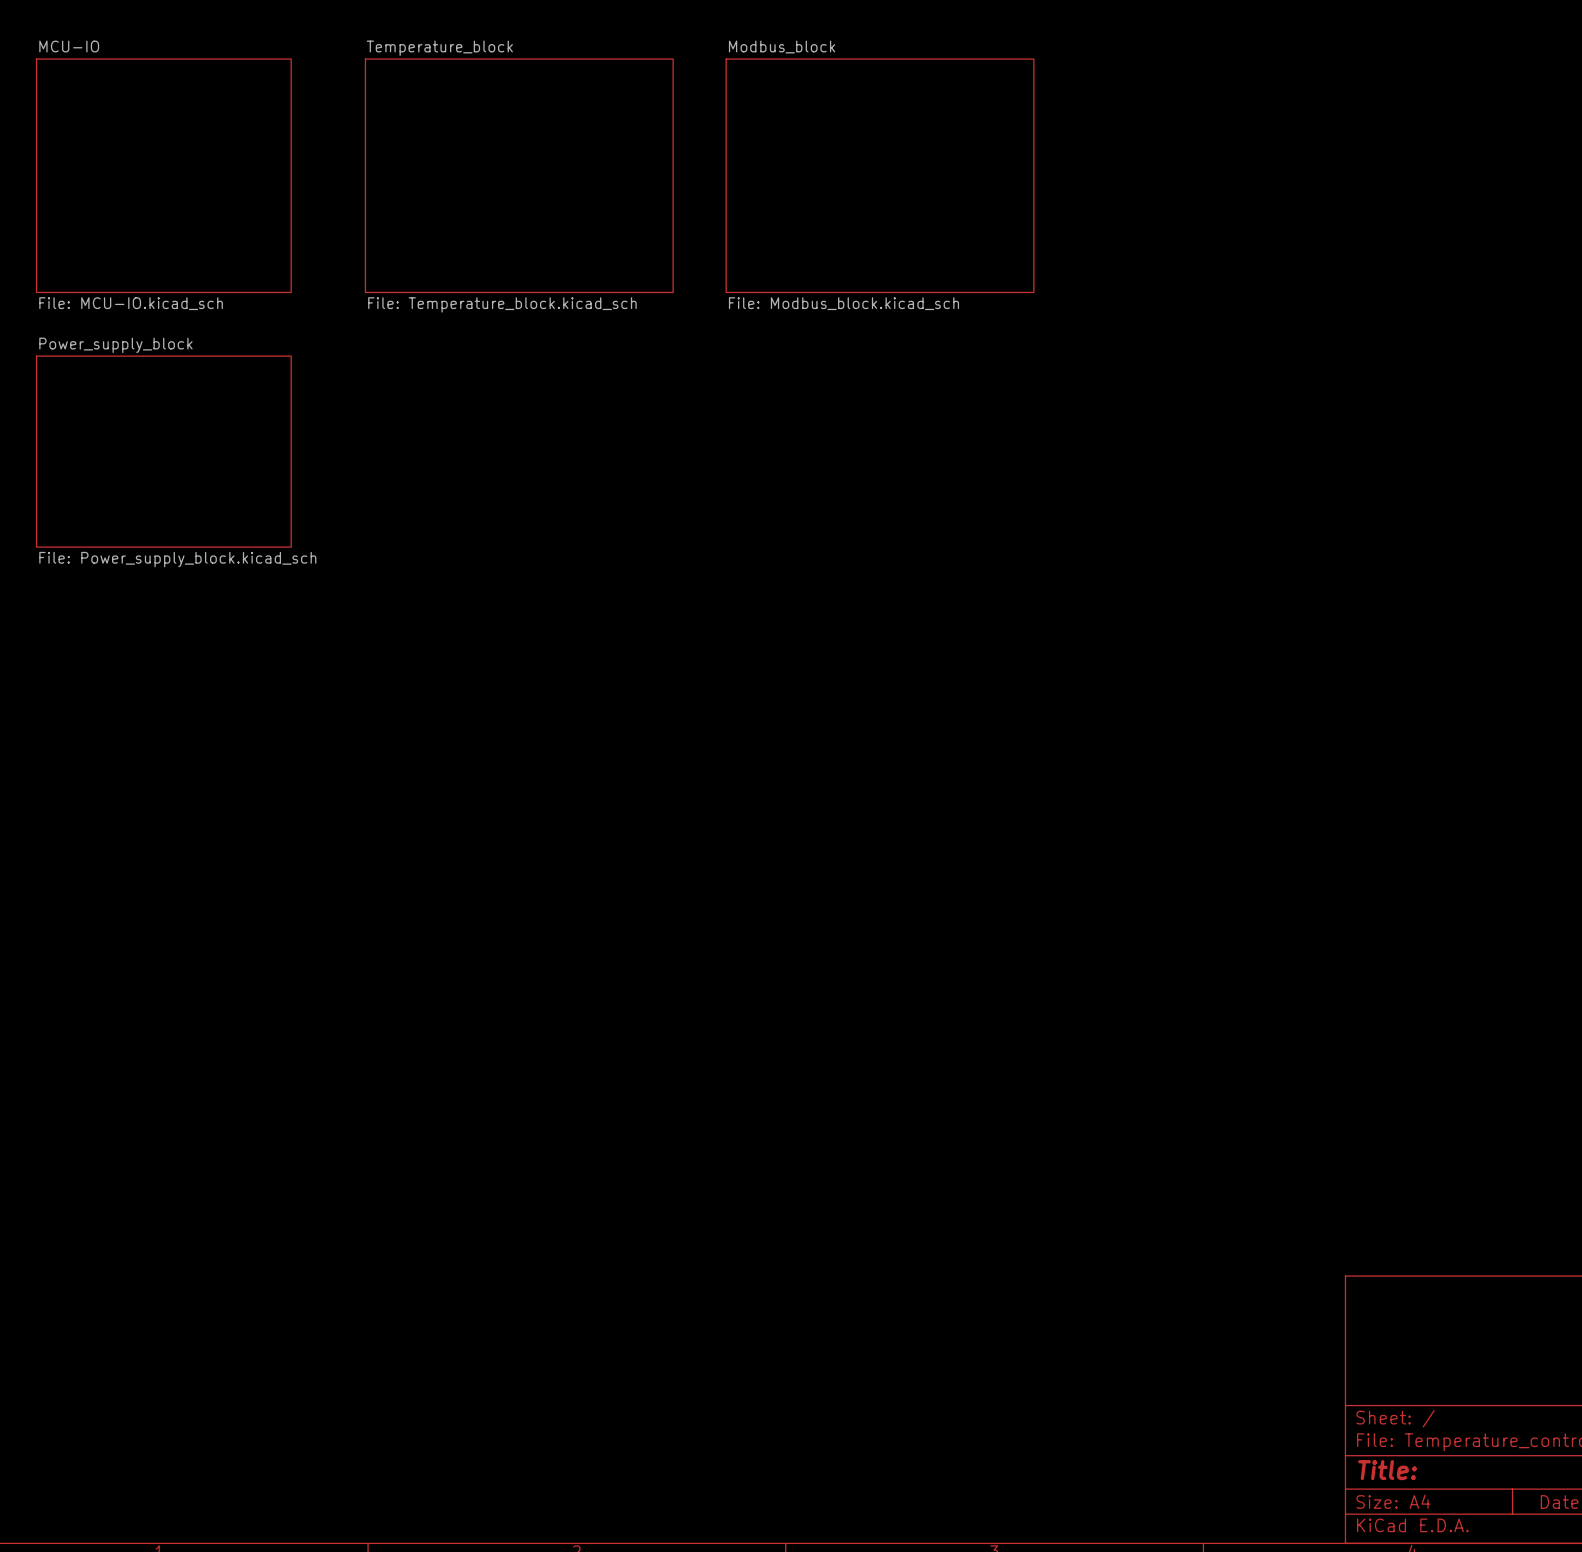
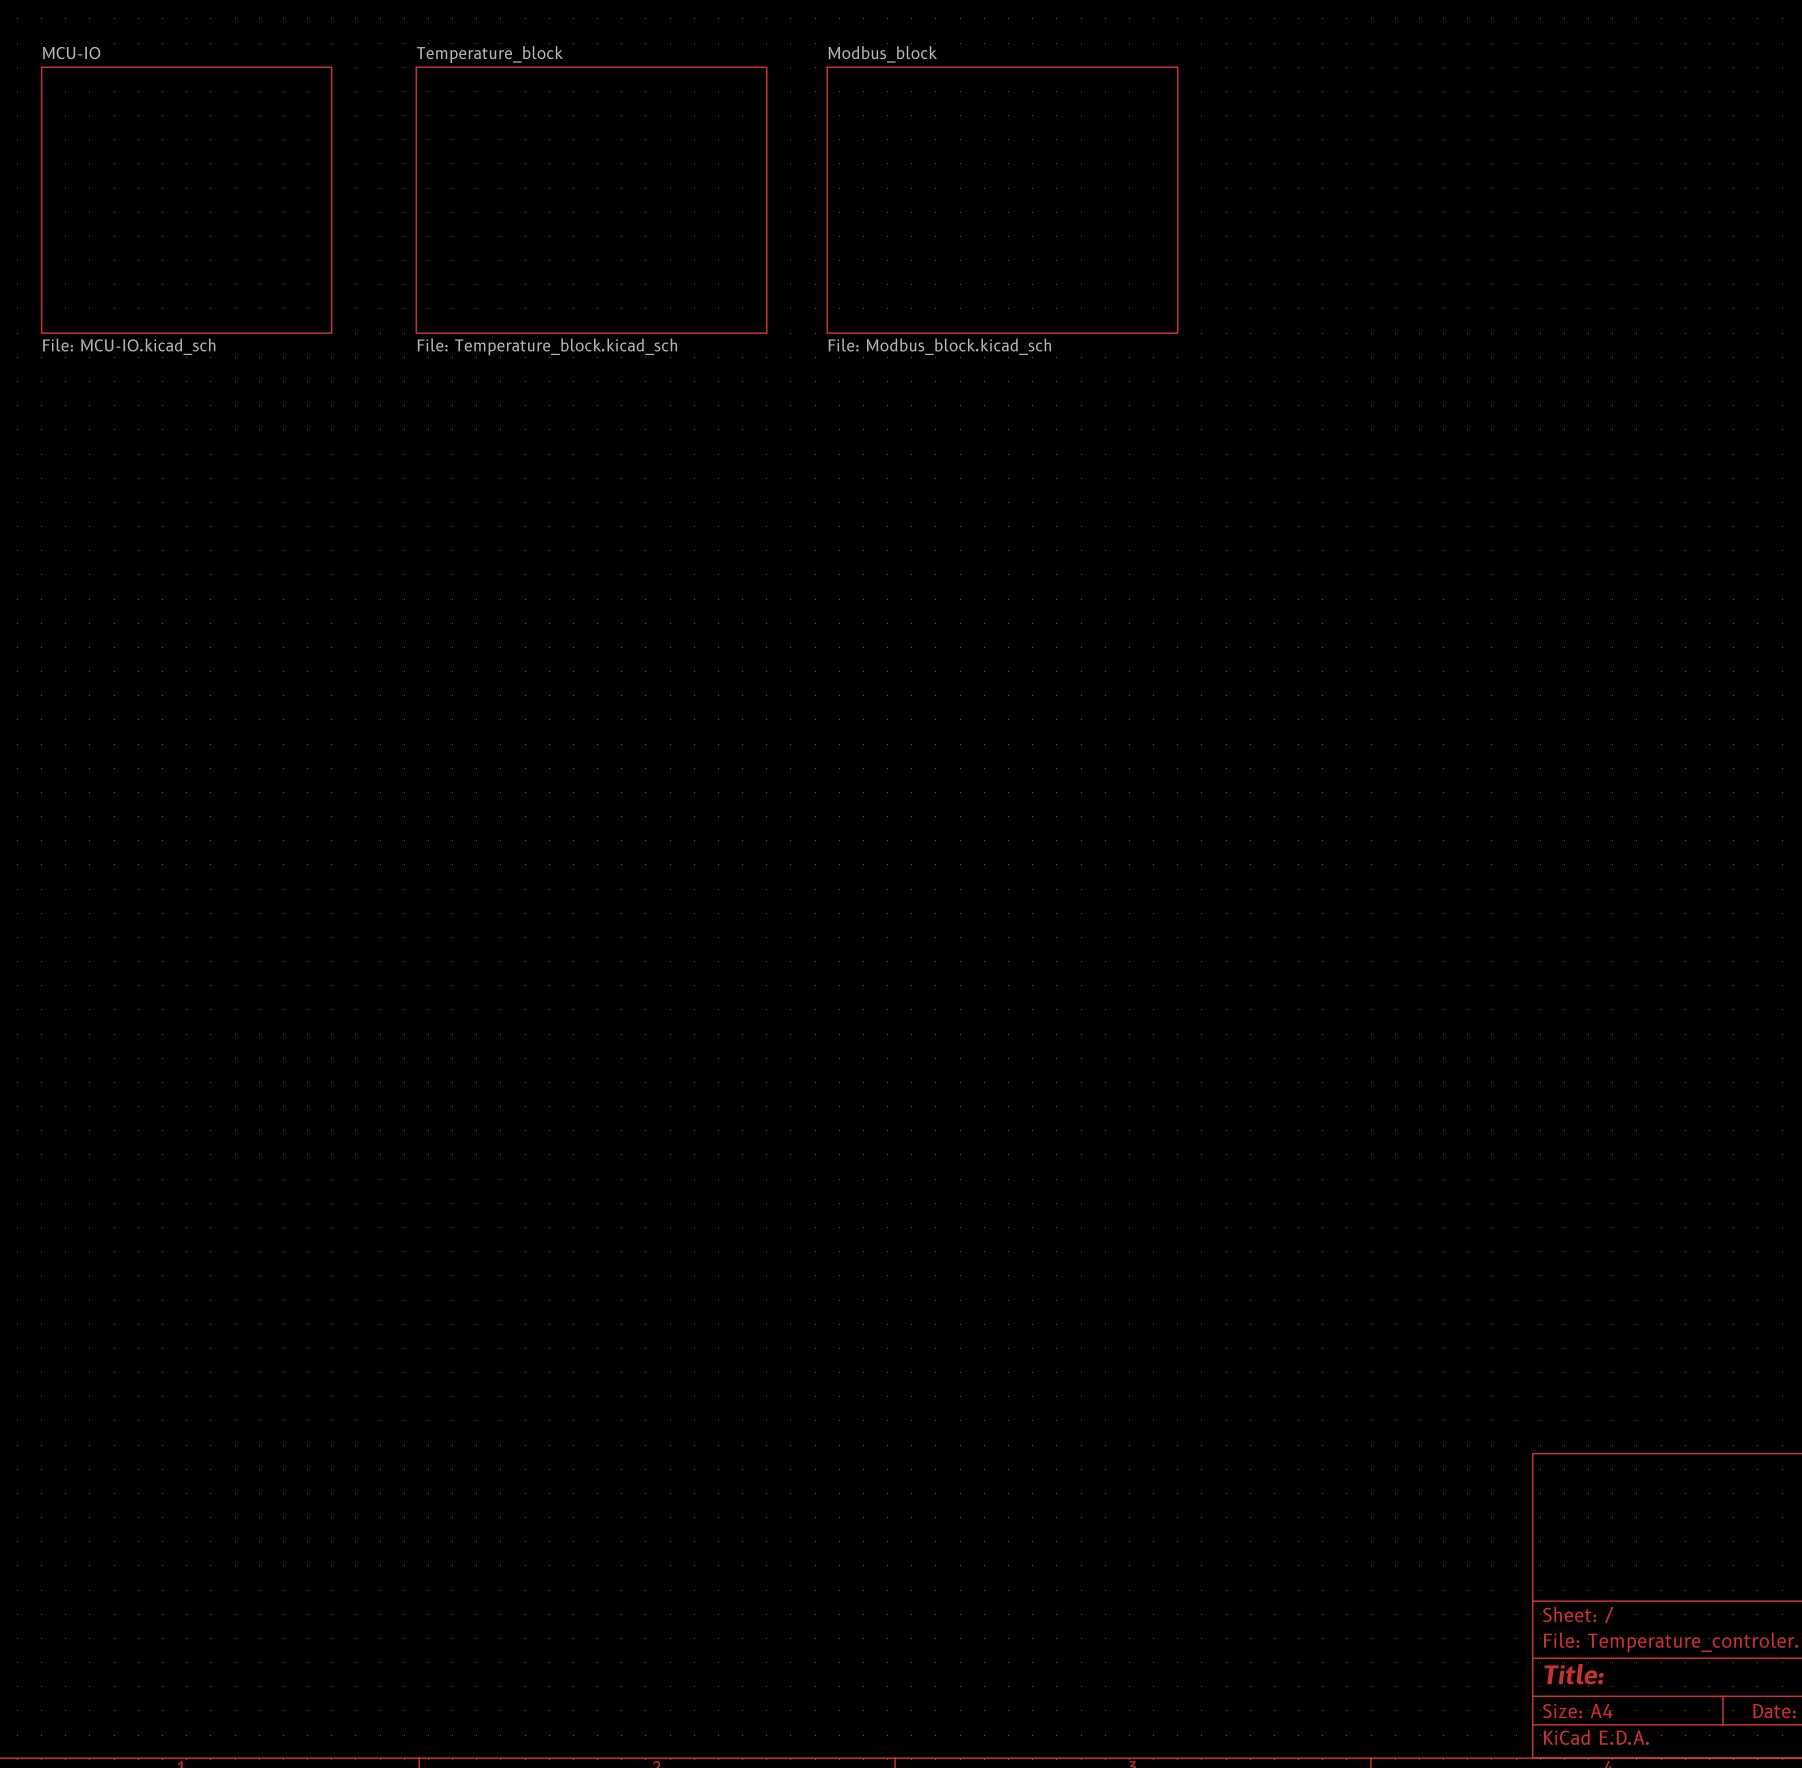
sheet Power_supply_block: File: Power_supply_block.kicad_sch (163, 451) -> none

